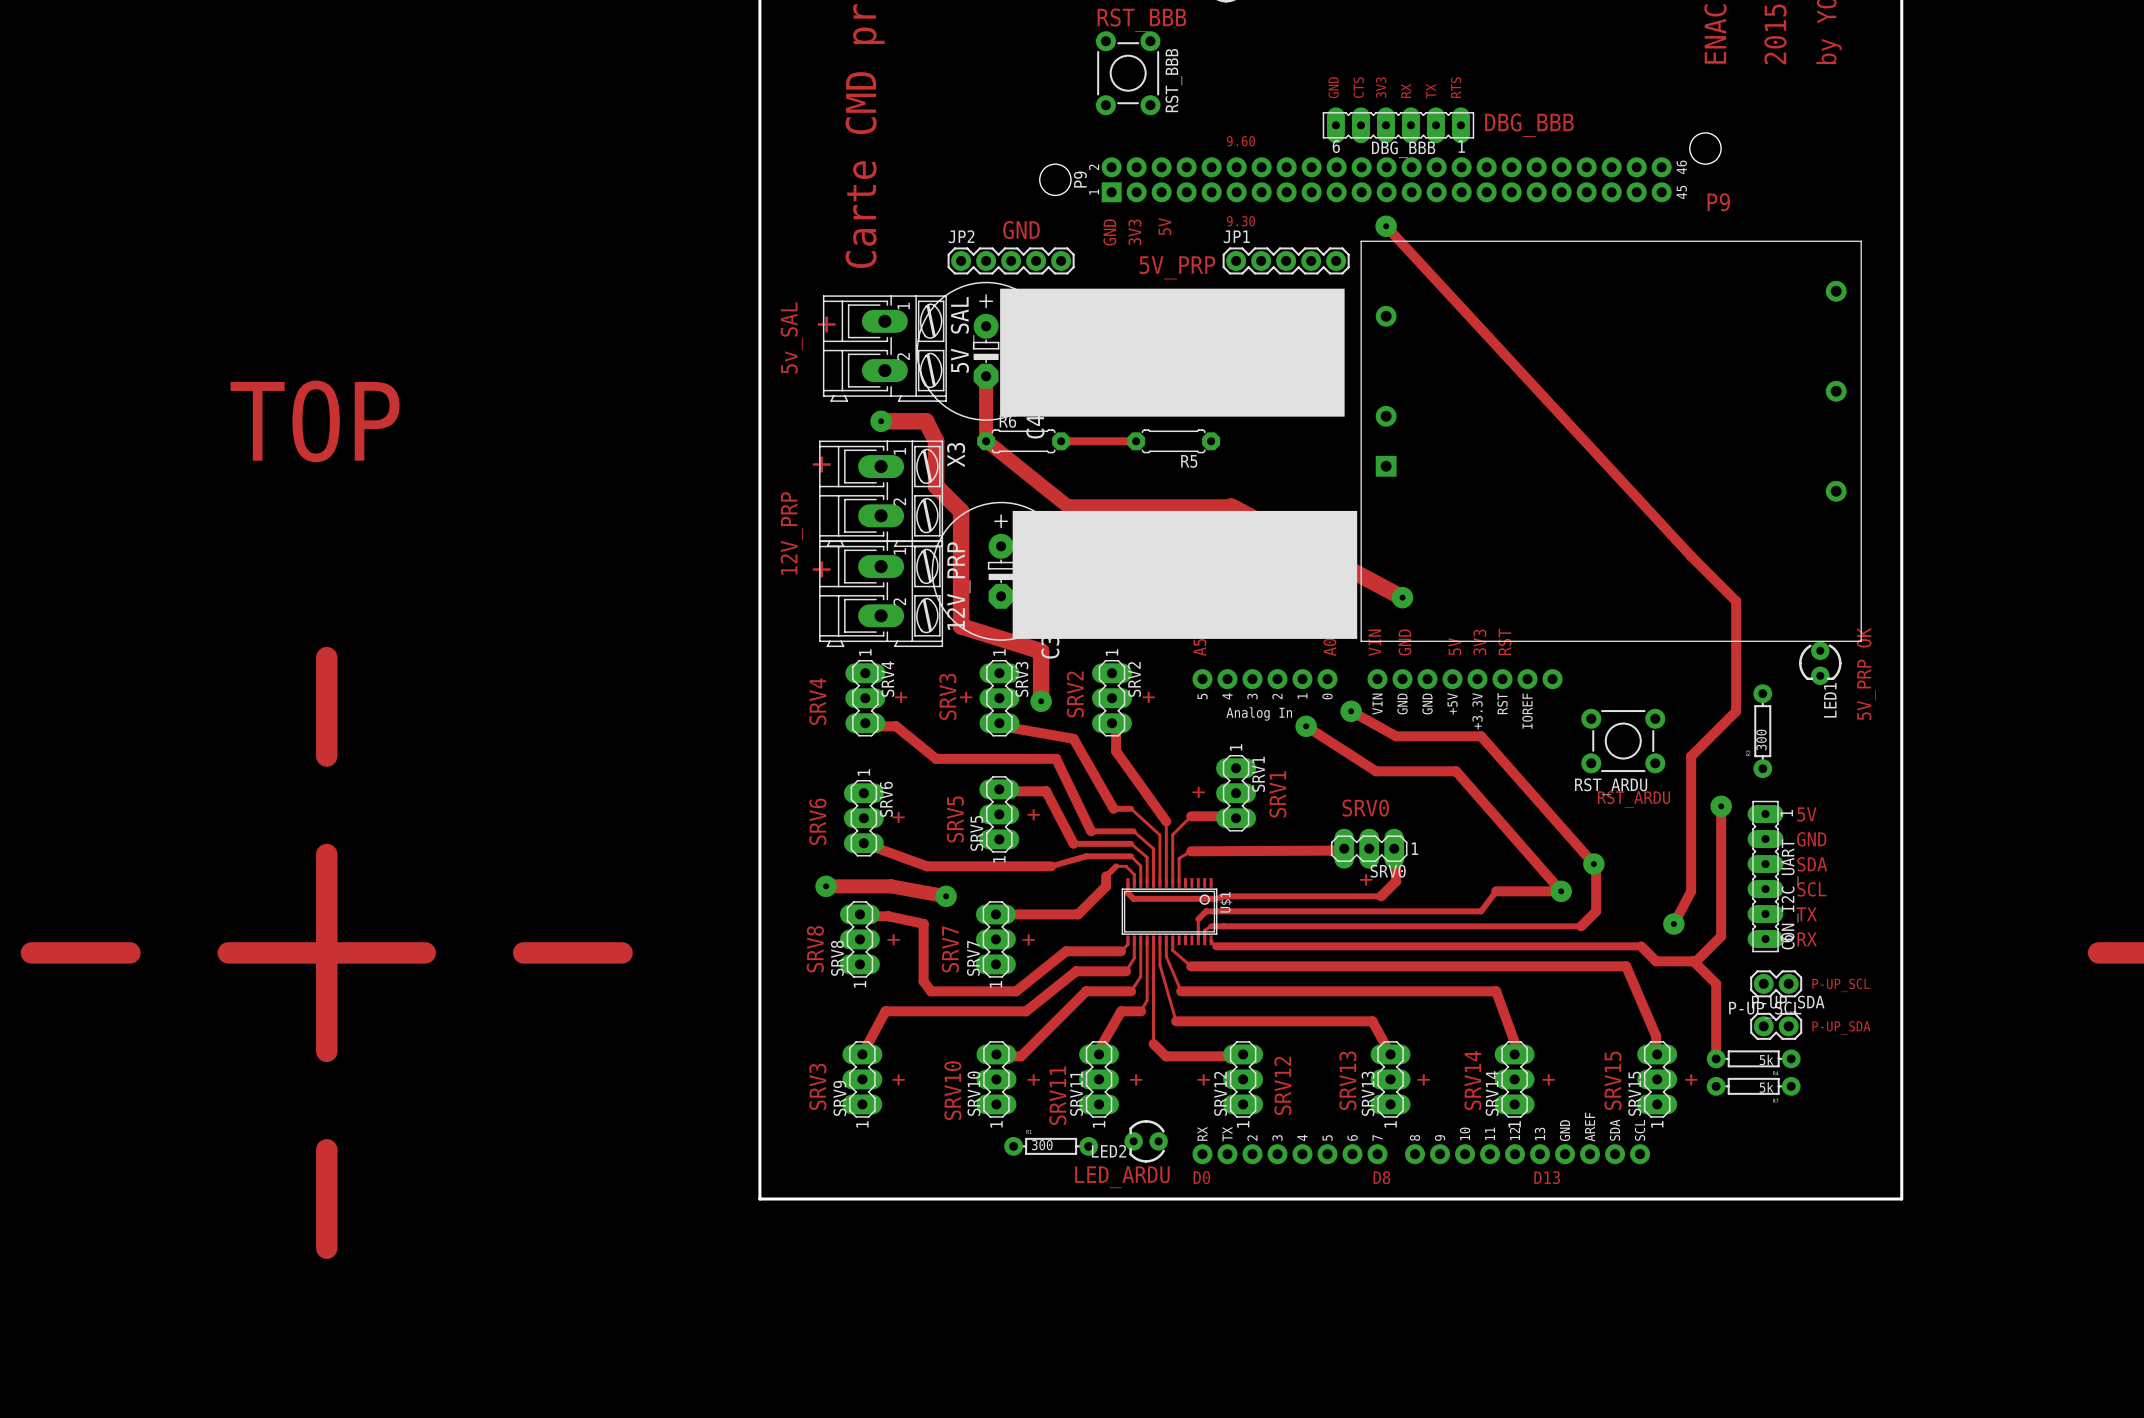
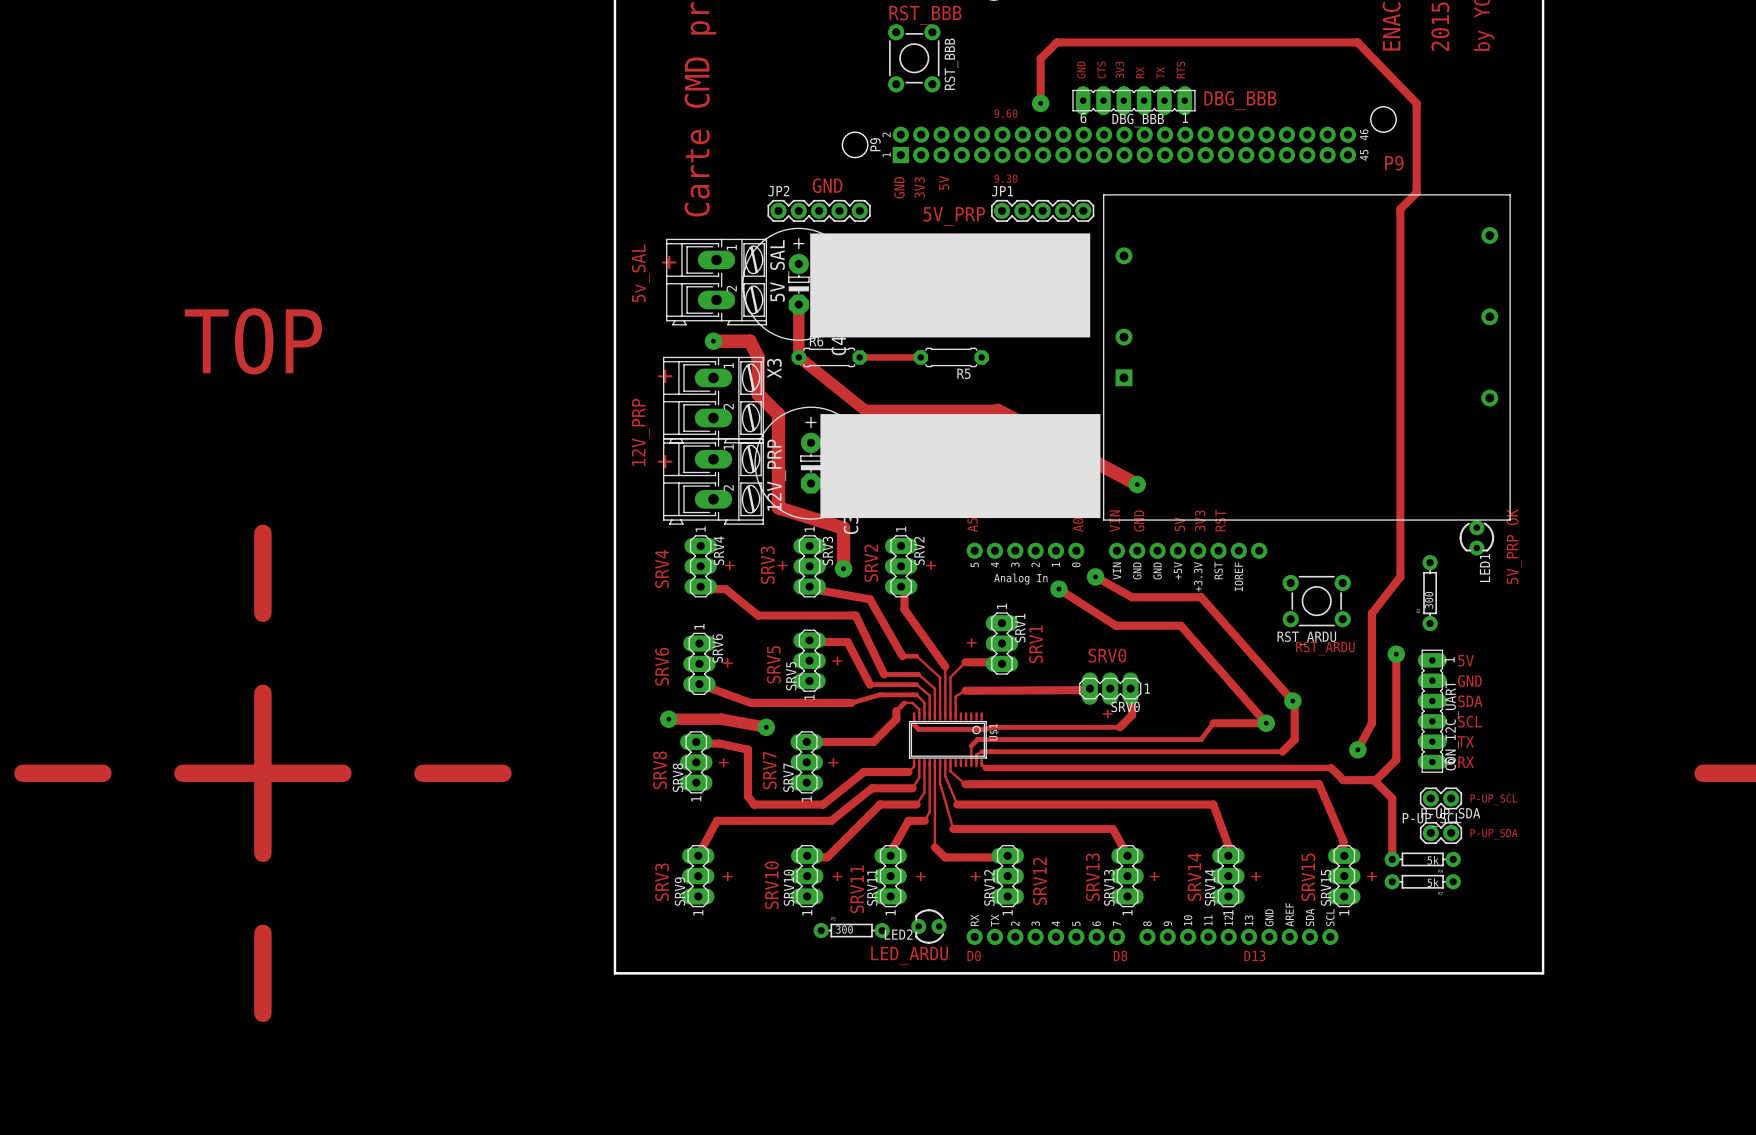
via: none -> (1040, 103)
track: (1386, 226) (1691, 556) (1736, 601) (1736, 711) (1691, 756) -> (1040, 103) (1040, 58) (1056, 42) (1357, 42) (1416, 103) (1416, 192) (1400, 209) (1400, 576) (1371, 613)
via: (1386, 226) -> none

